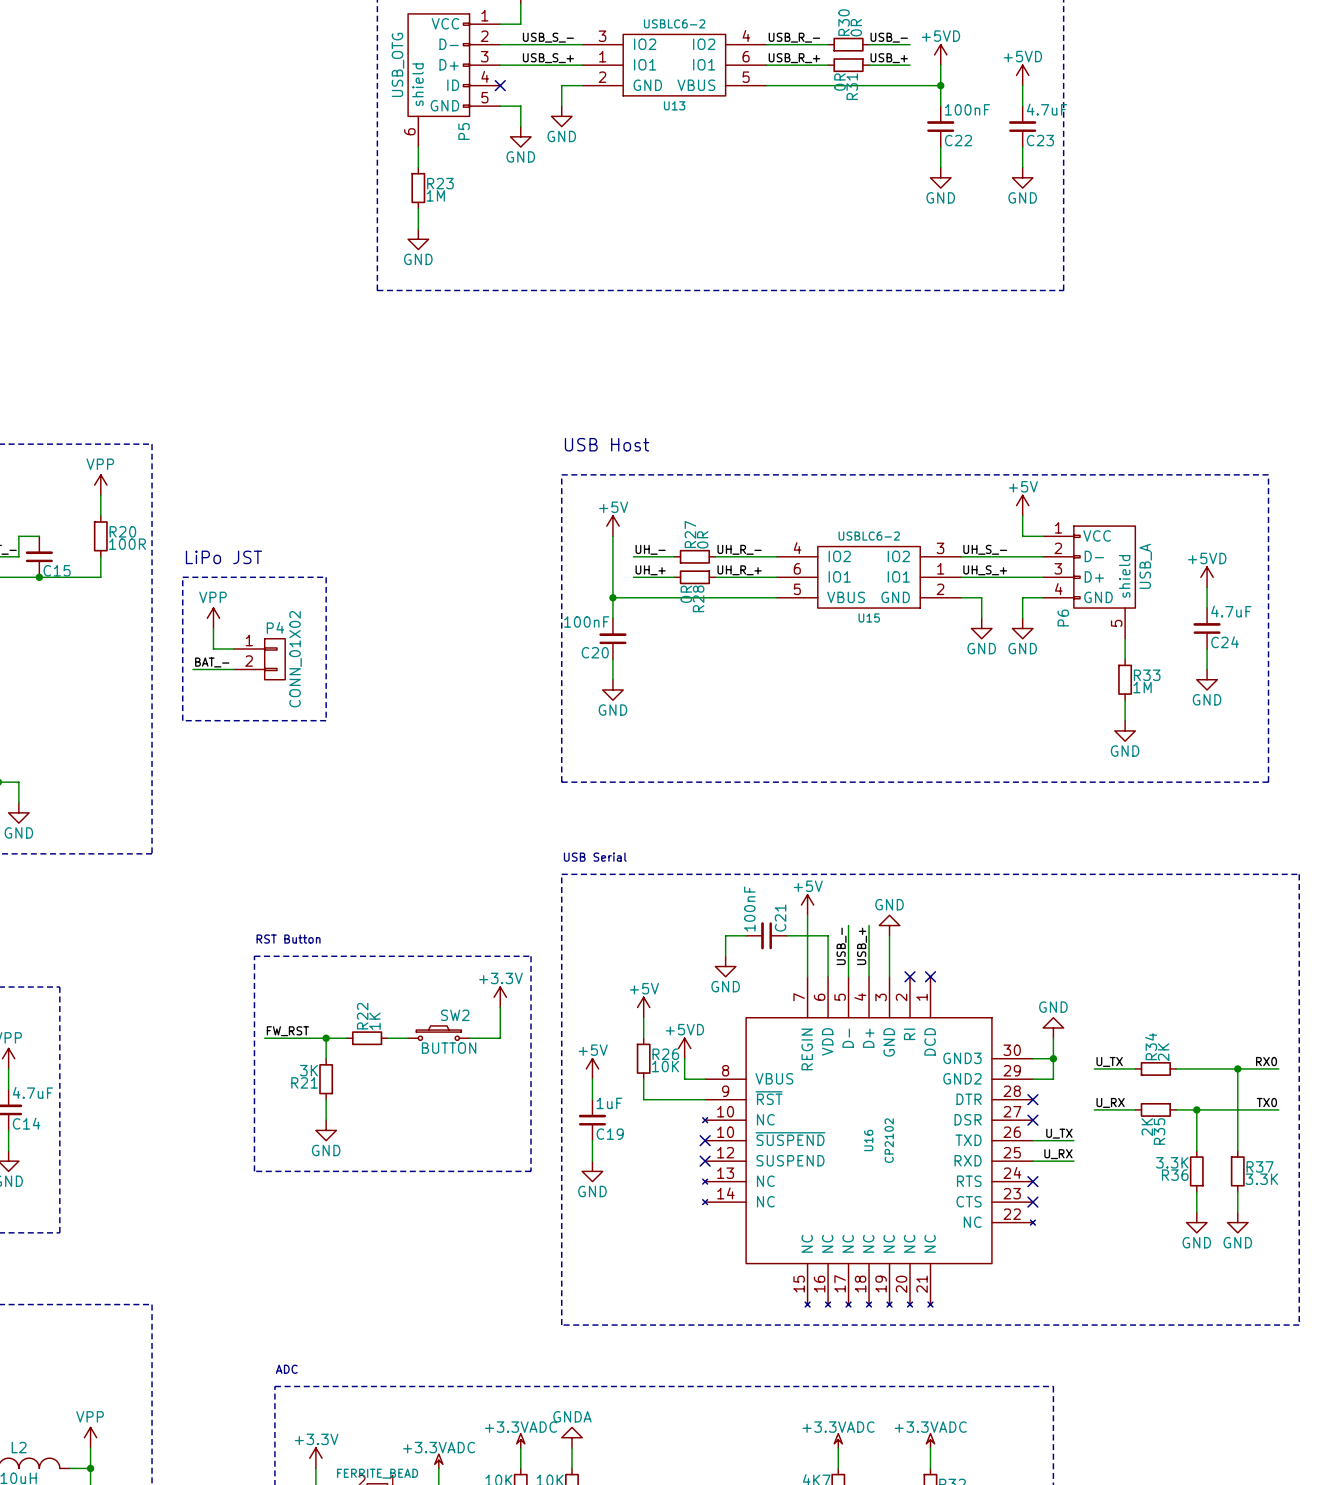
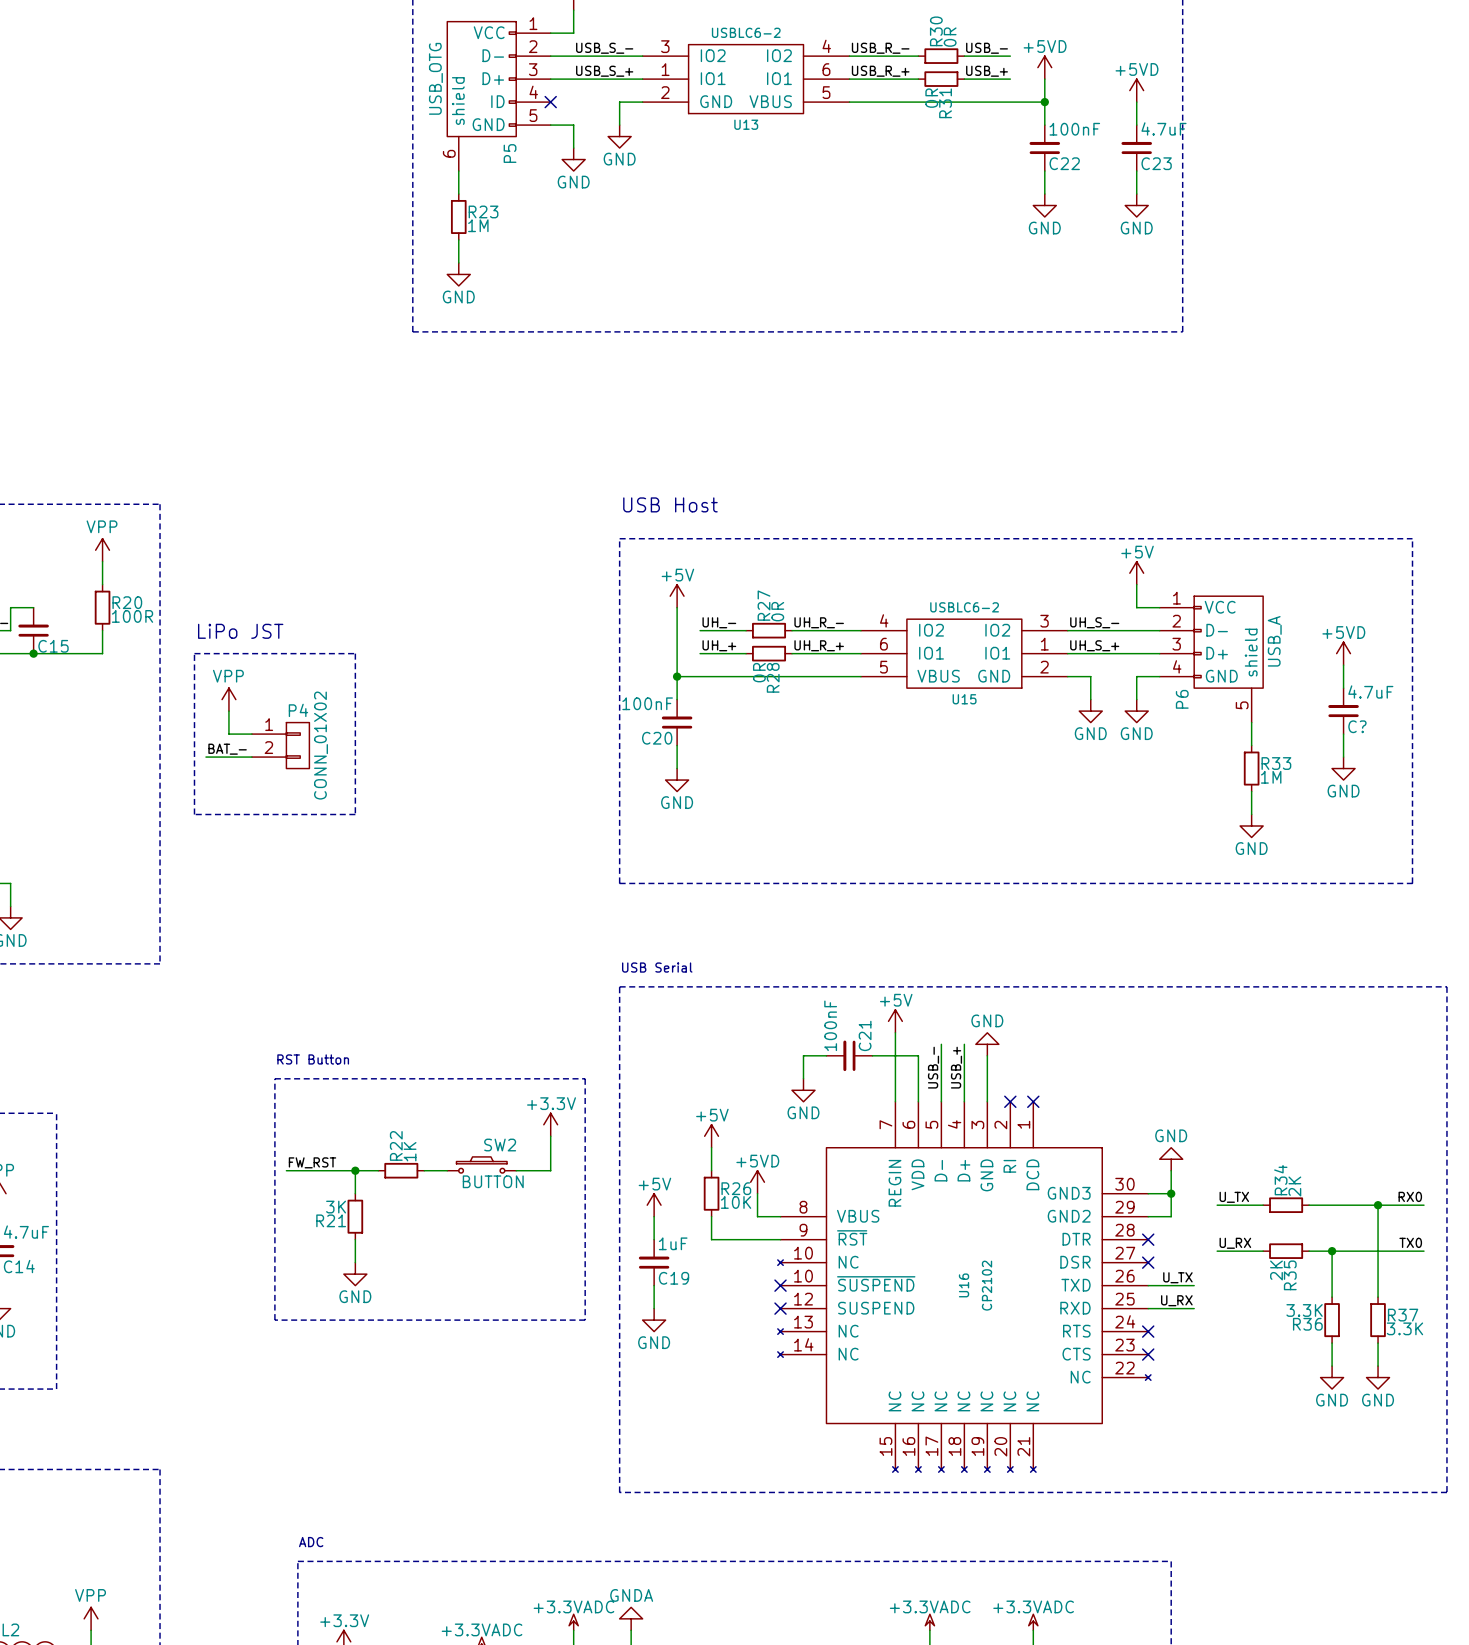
C24 name: C24 (1225, 642) -> C? (1357, 726)

